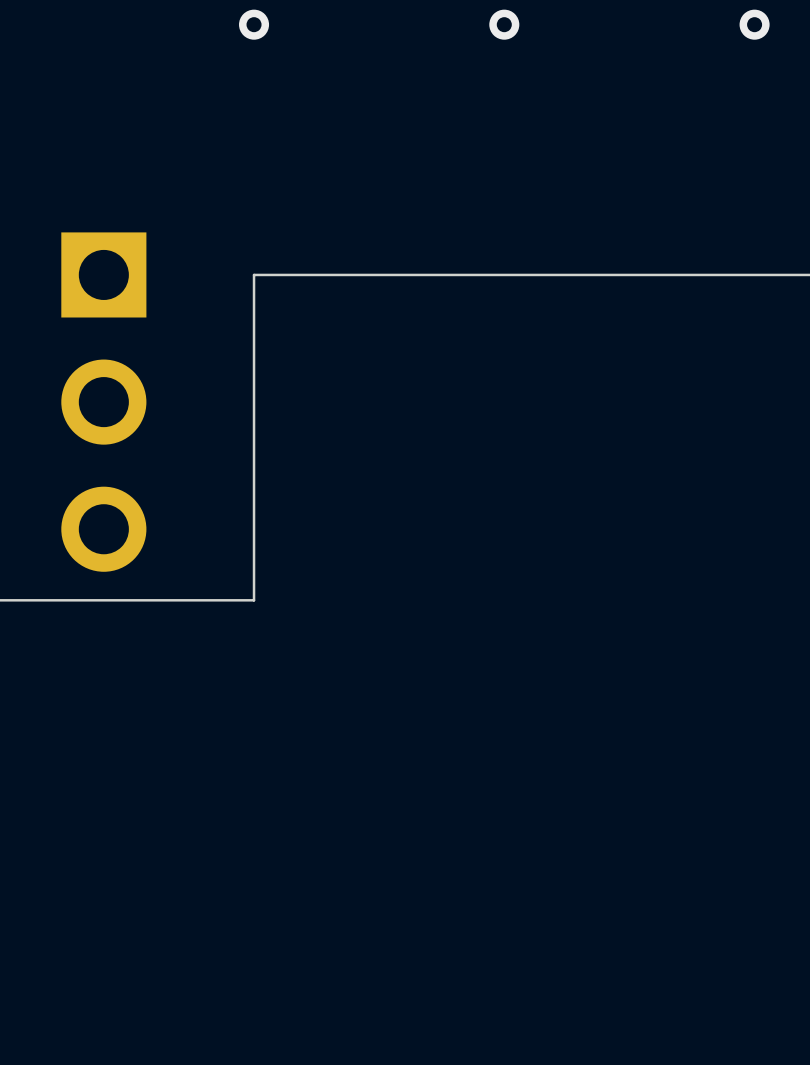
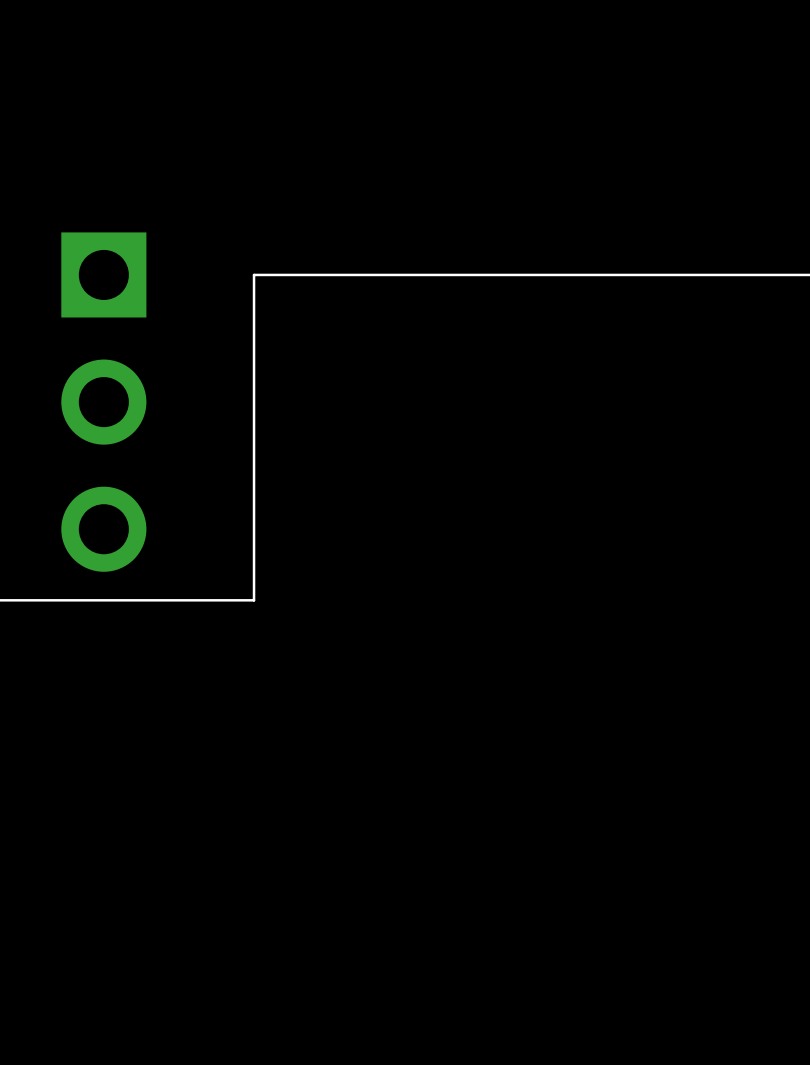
via: (254, 24) -> none
via: (504, 24) -> none
via: (754, 24) -> none

